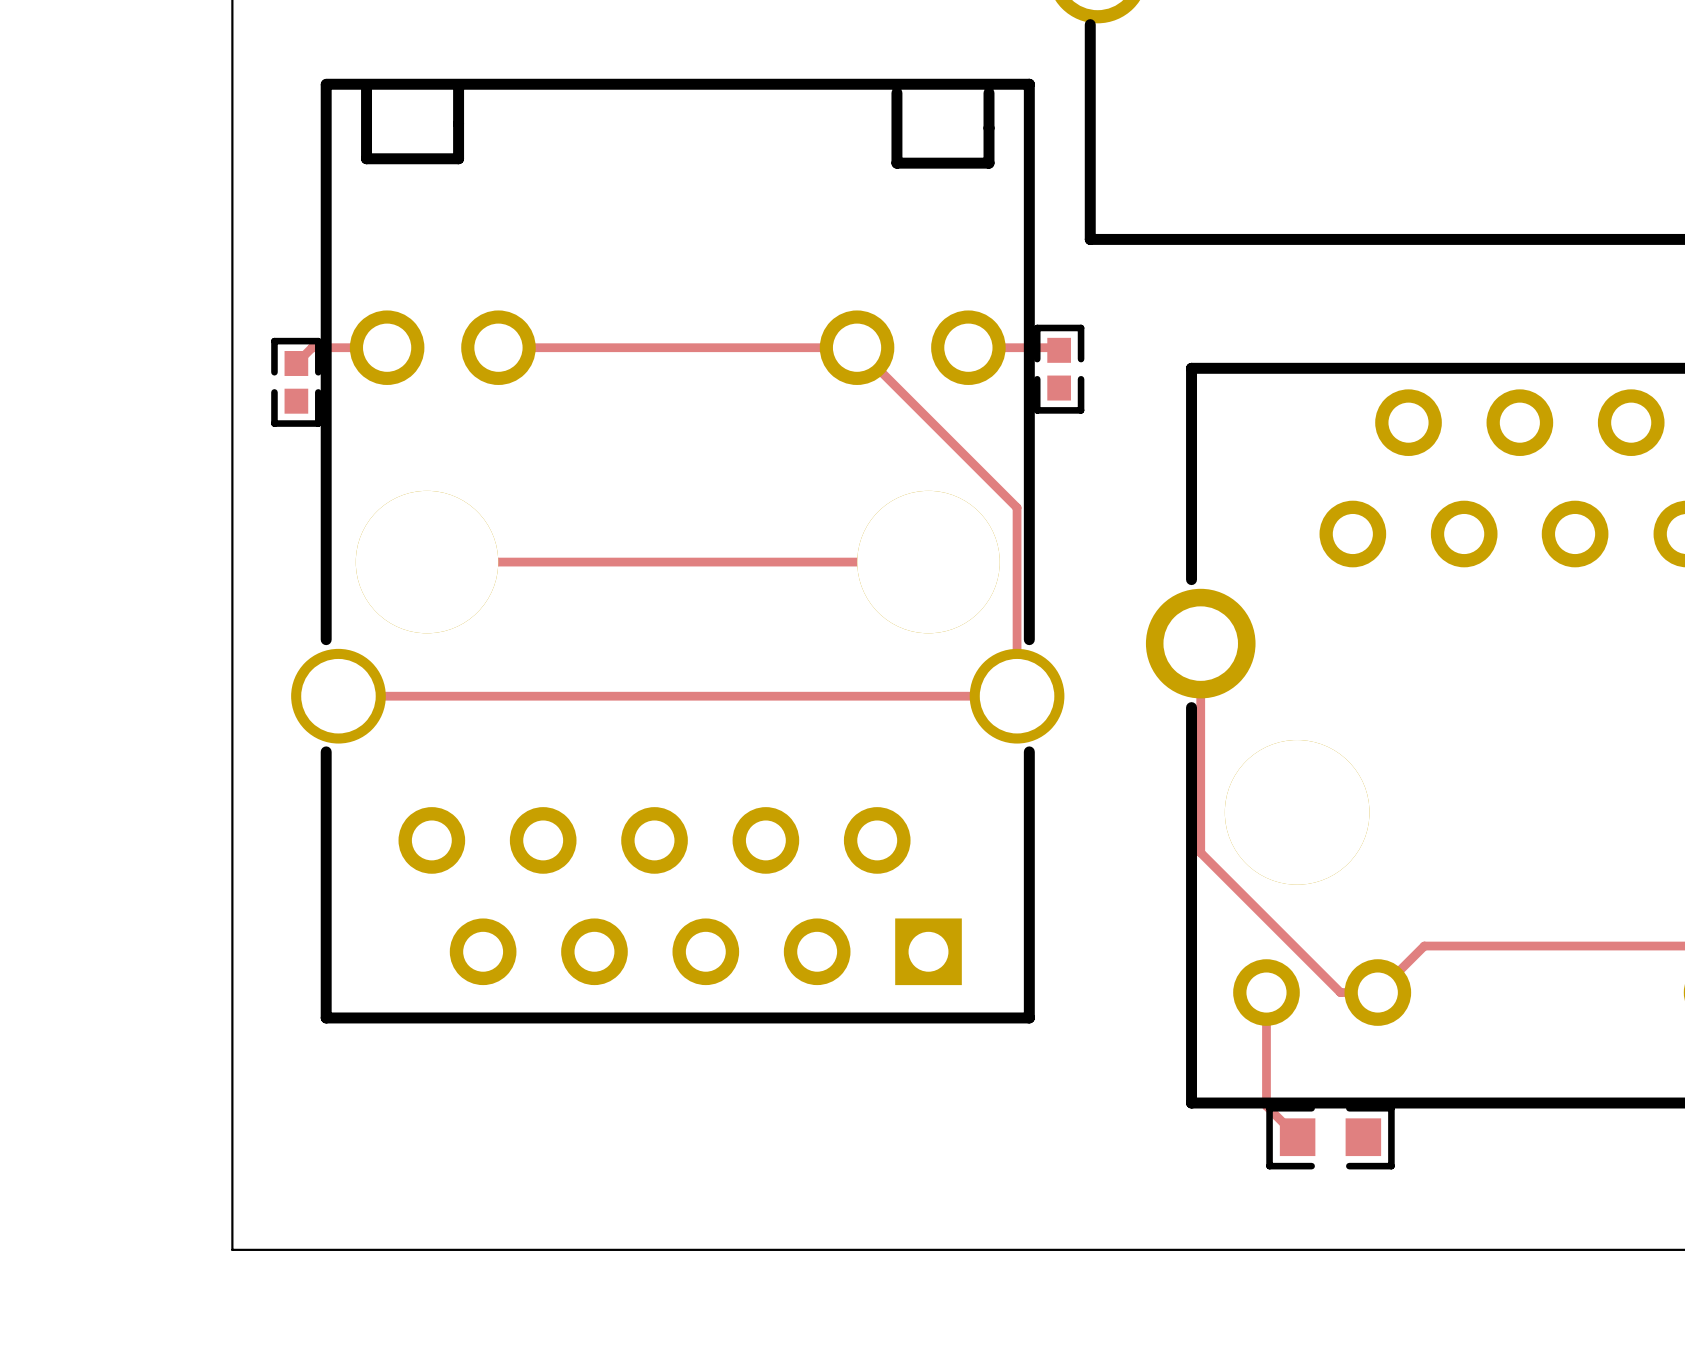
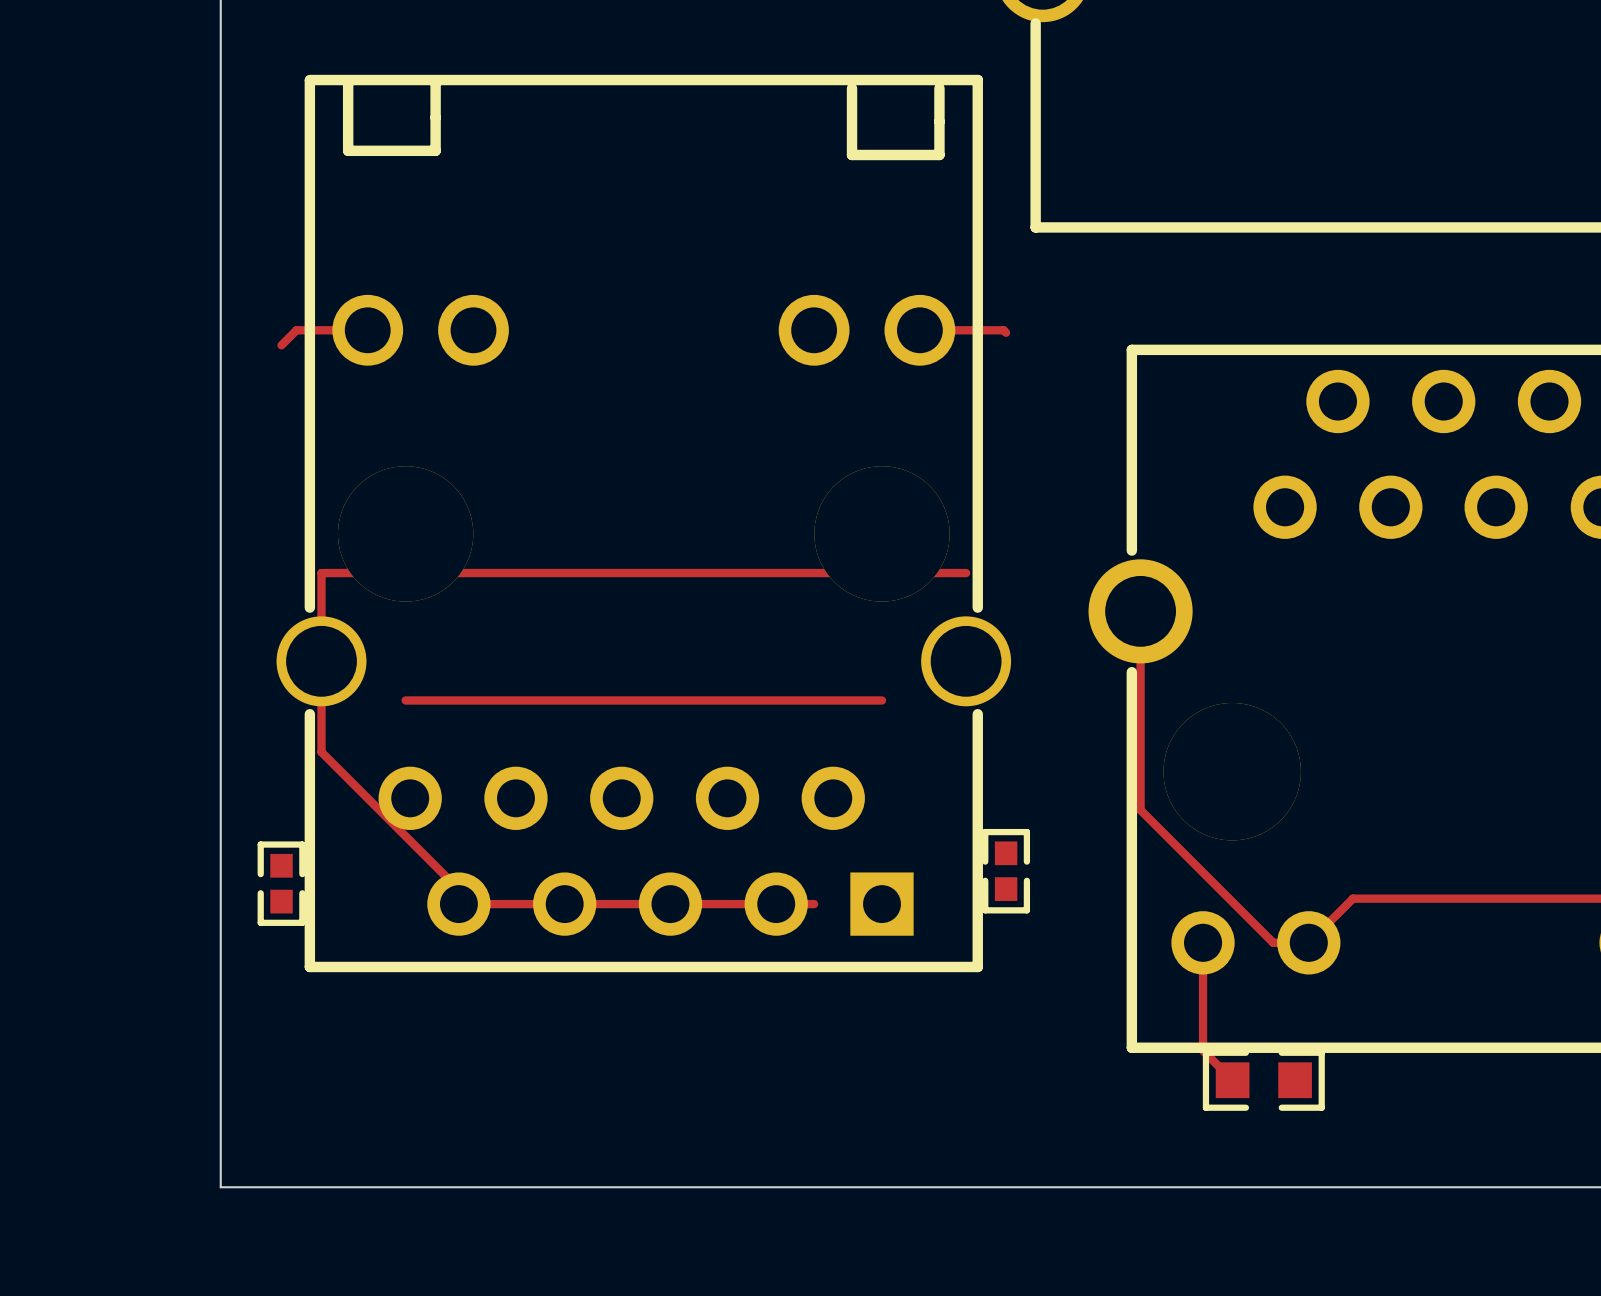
top track: (498, 347) (857, 347) (1017, 507) (1017, 696) (338, 696) -> none
part: (1059, 369) -> none
part: (296, 382) -> none
top track: (427, 562) (928, 562) -> (405, 700) (881, 700)
top track: none -> (966, 573) (321, 573) (321, 752) (473, 904) (814, 904)
part: none -> (1006, 871)
part: none -> (281, 883)

